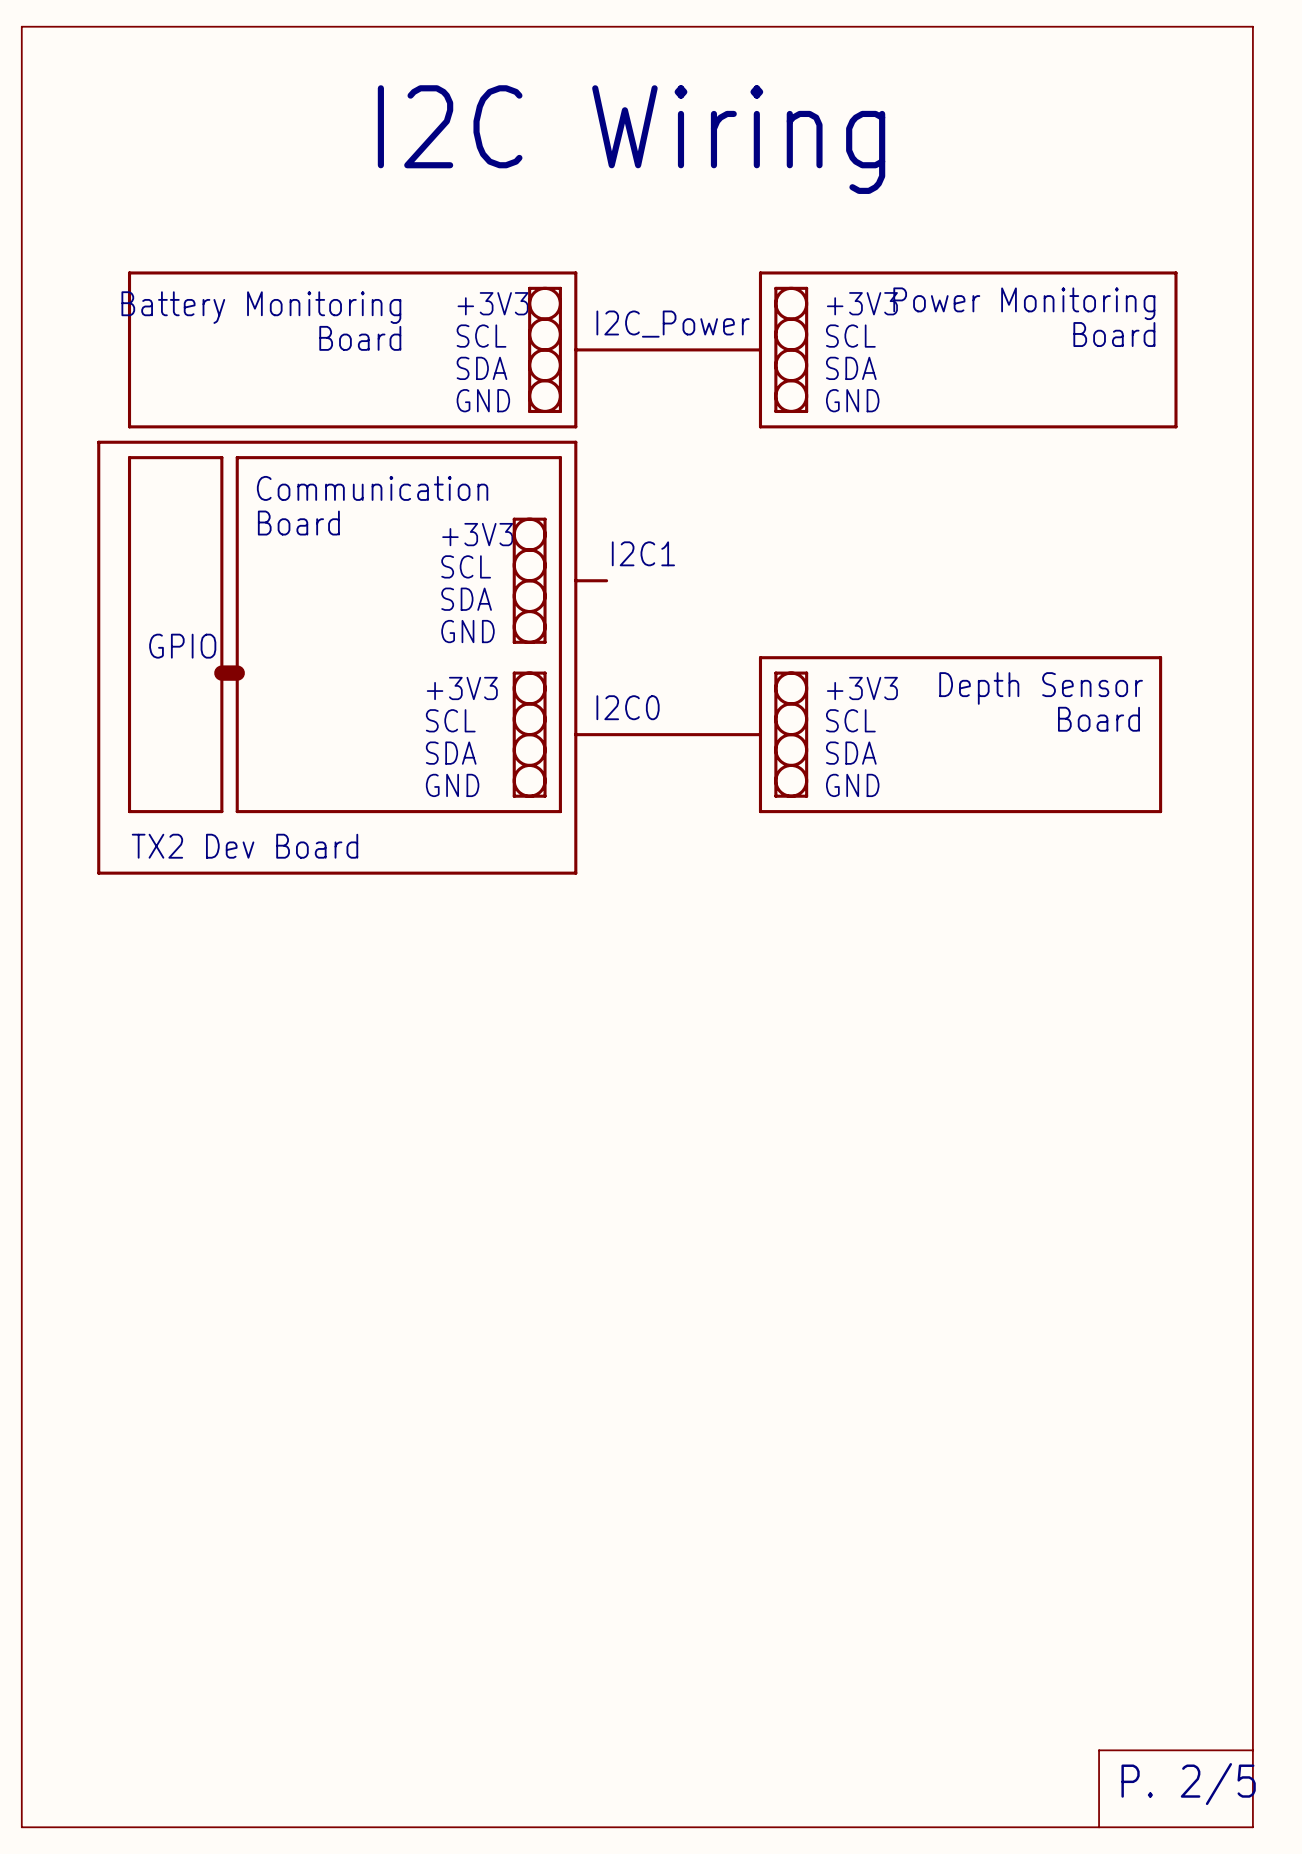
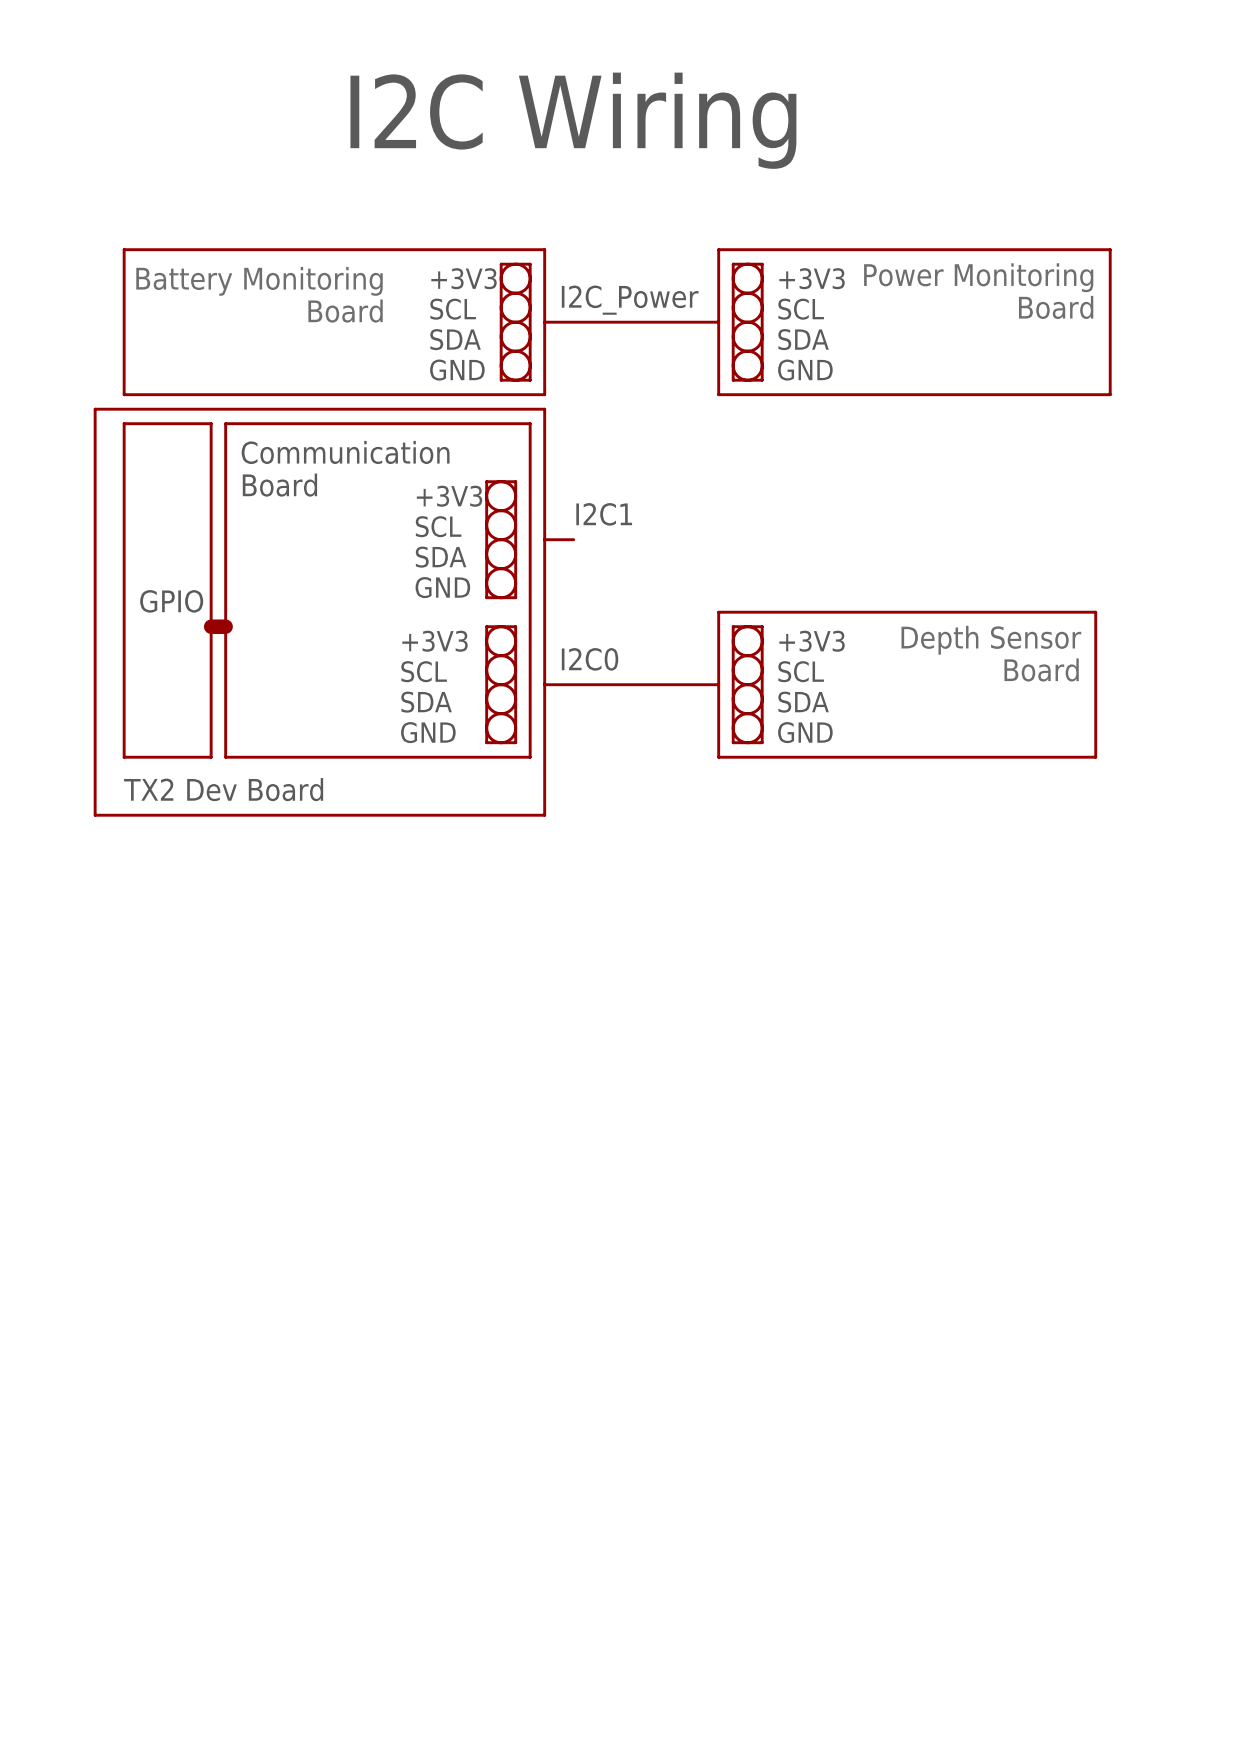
line: (21, 26) (1252, 26) (1252, 1827) (21, 1827) (21, 26) -> none
line: (1252, 1750) (1099, 1750) (1099, 1827) -> none
text: P. 2/5 (1188, 1784) -> none

